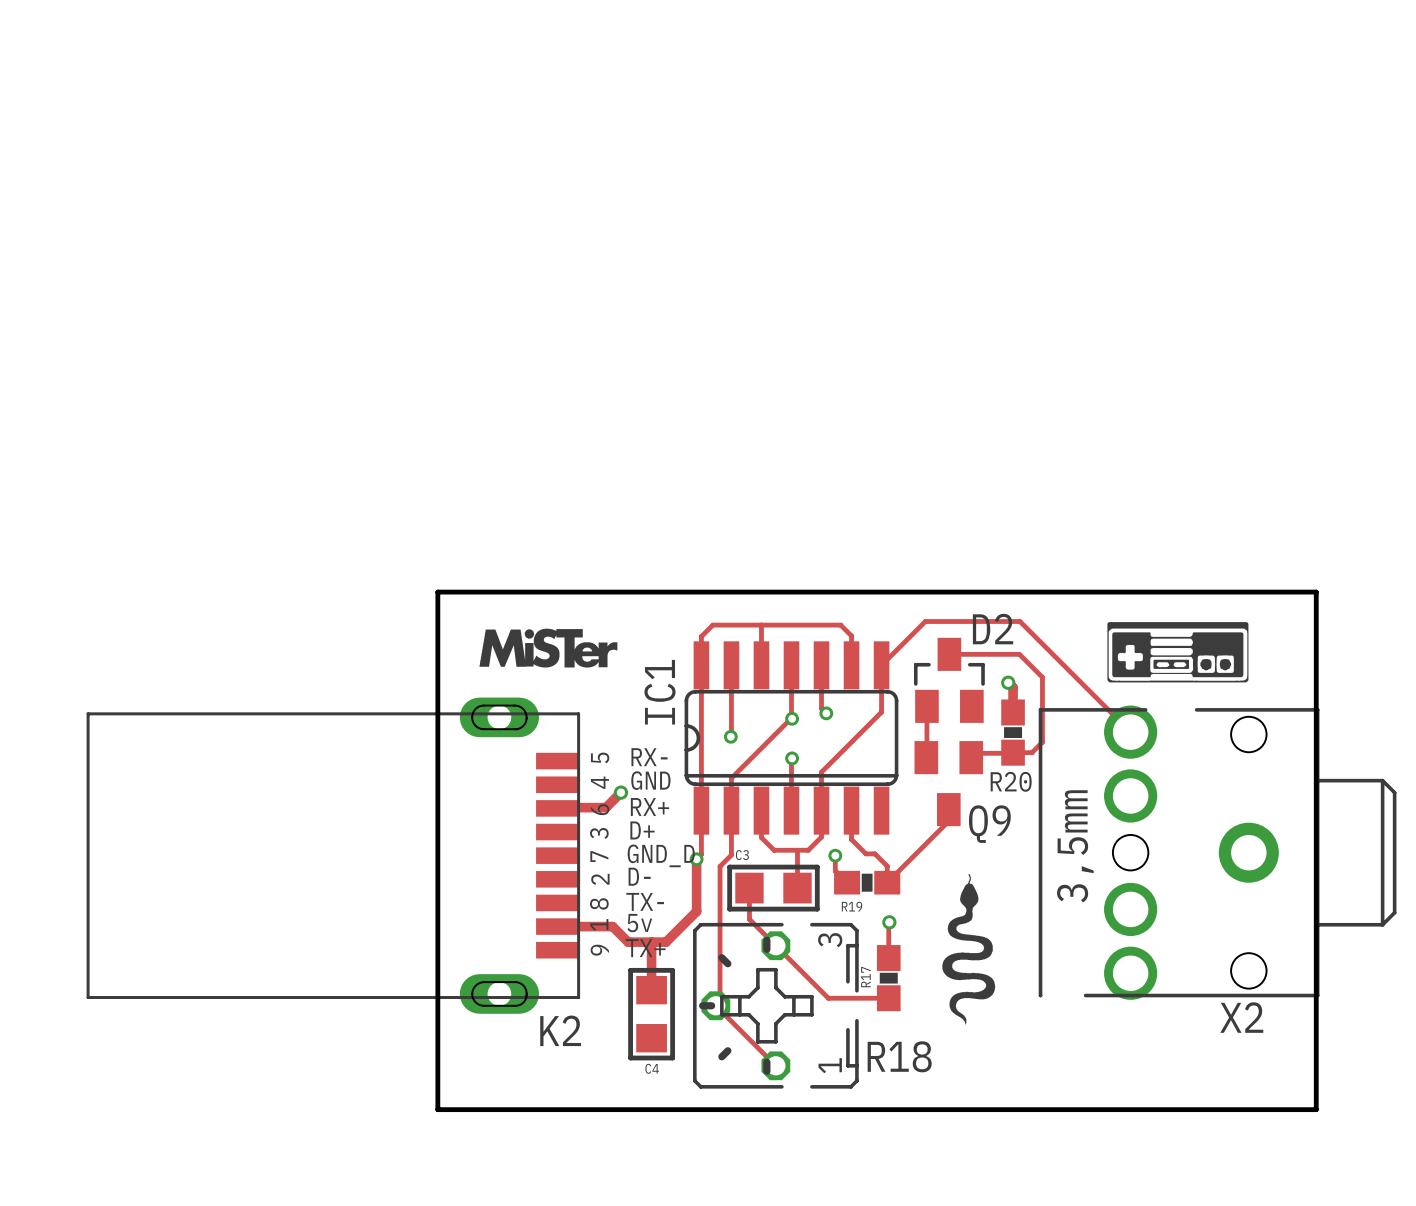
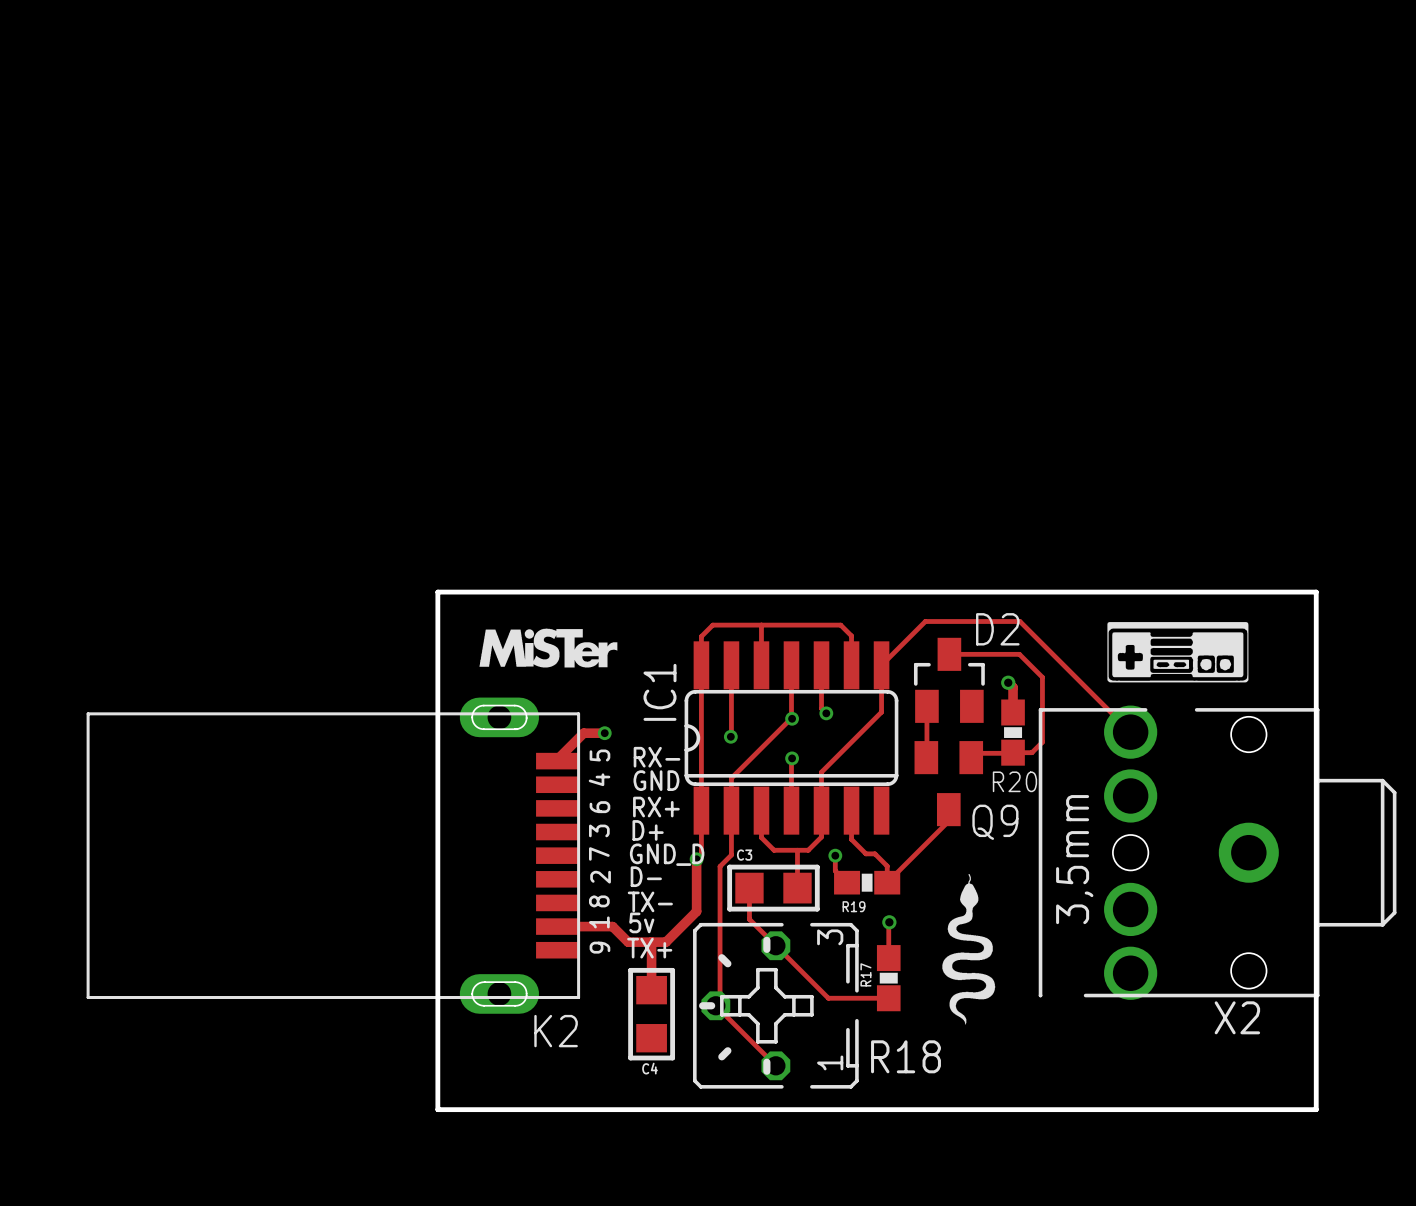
track: none -> (604, 733) (583, 733) (557, 759)
via: none -> (604, 733)
track: (620, 792) (605, 807) (557, 808) -> none
via: (620, 792) -> none

